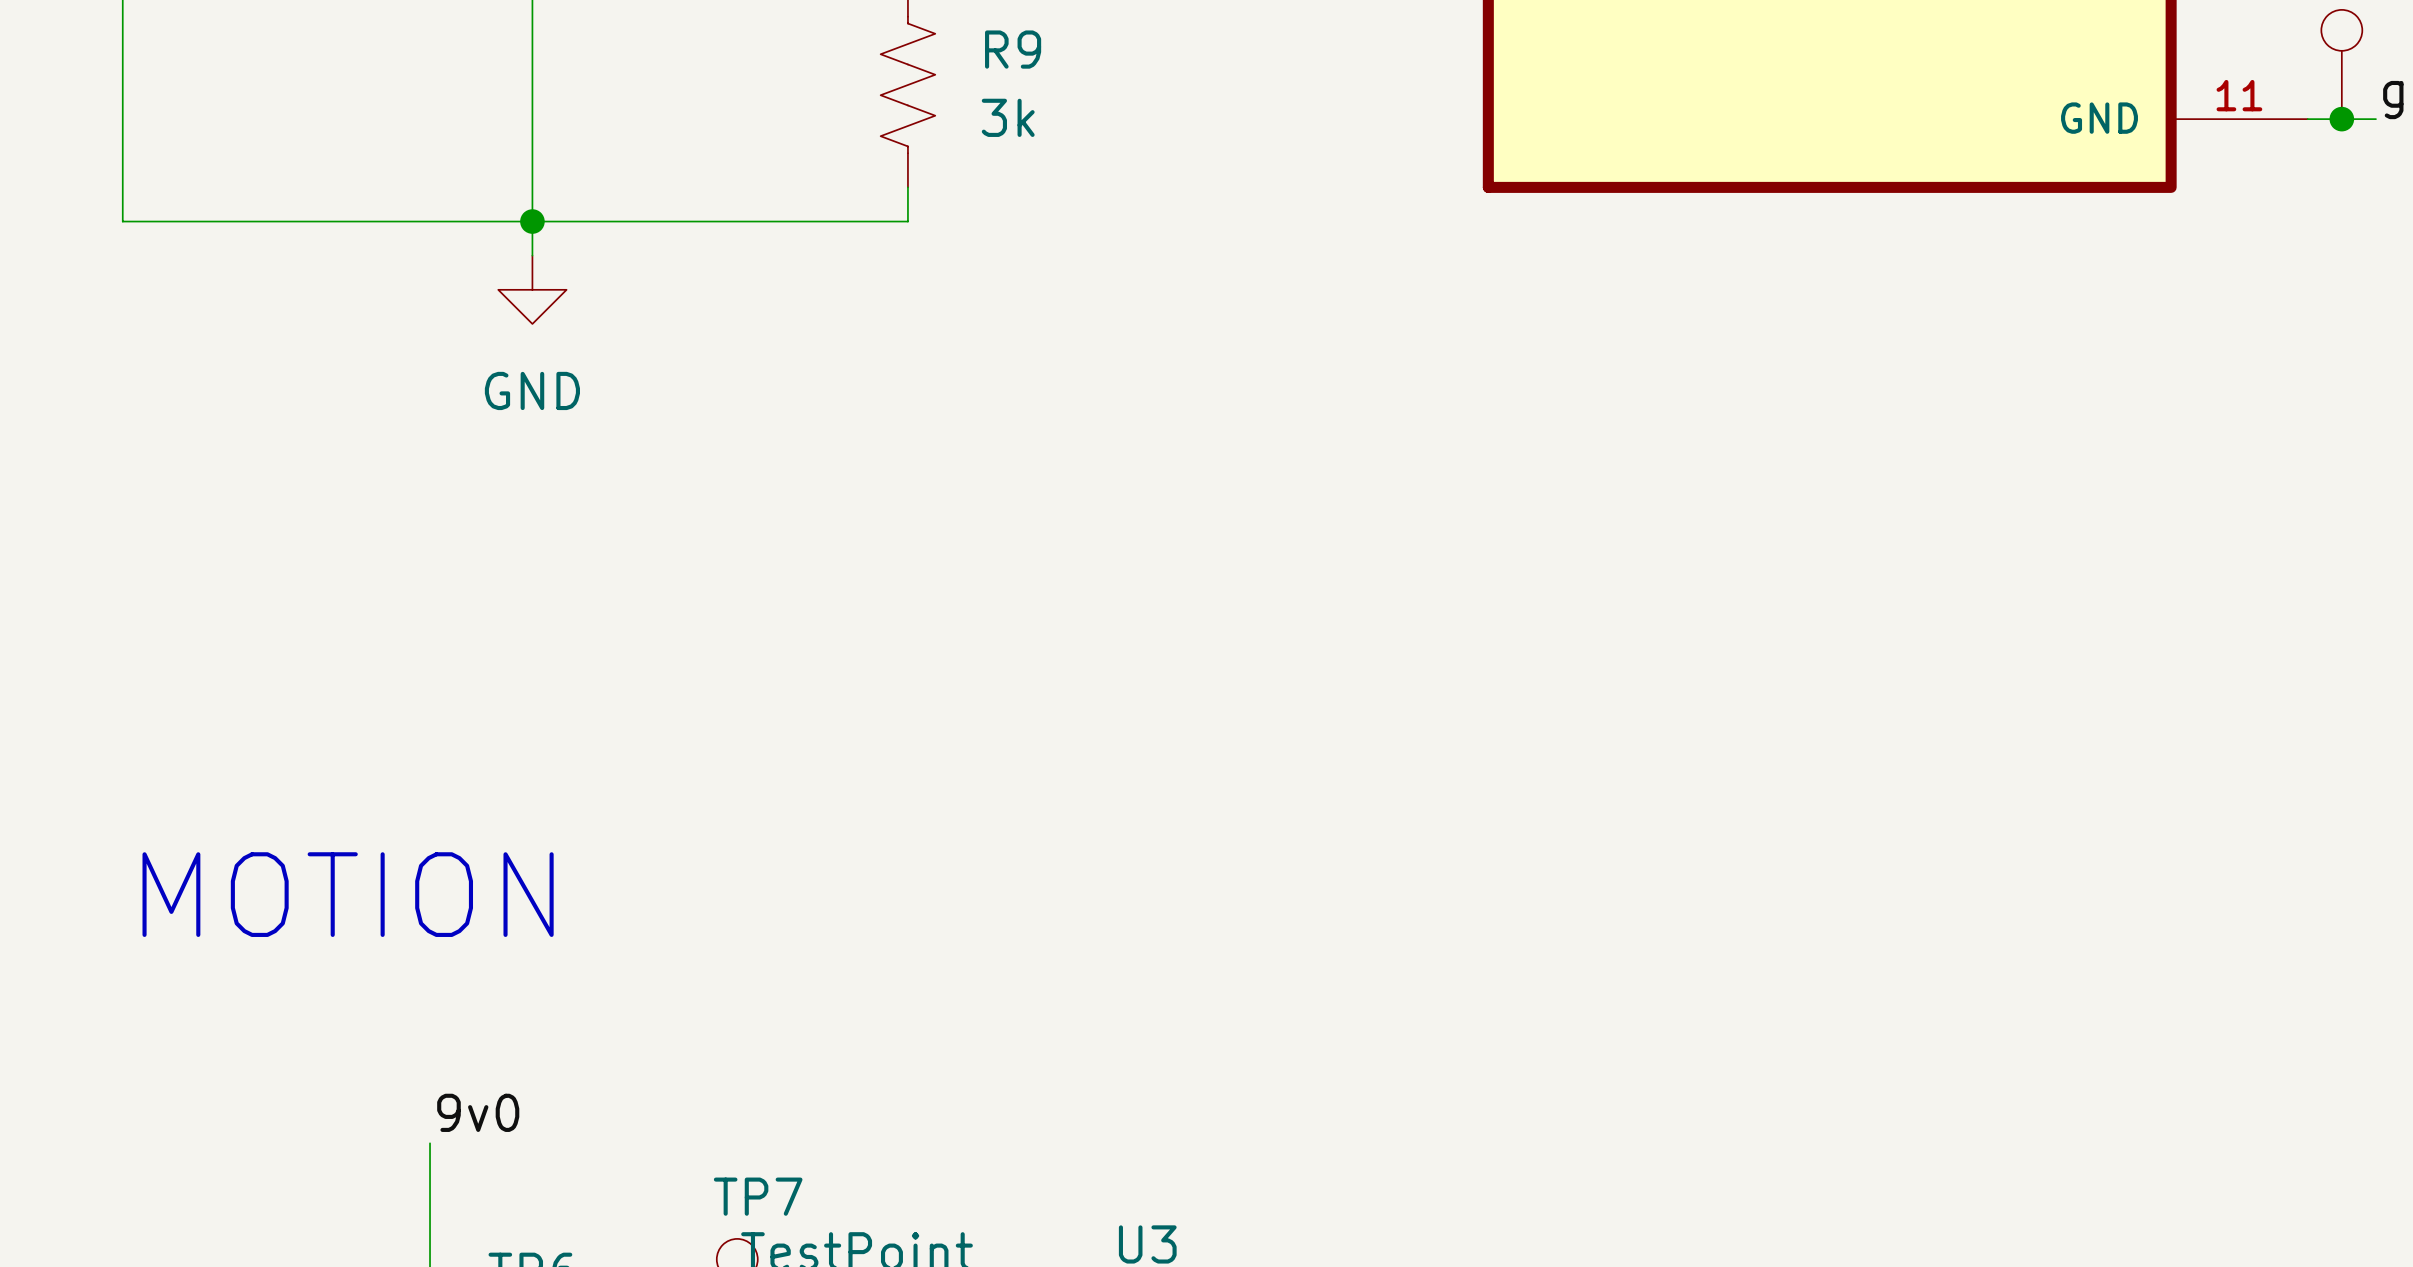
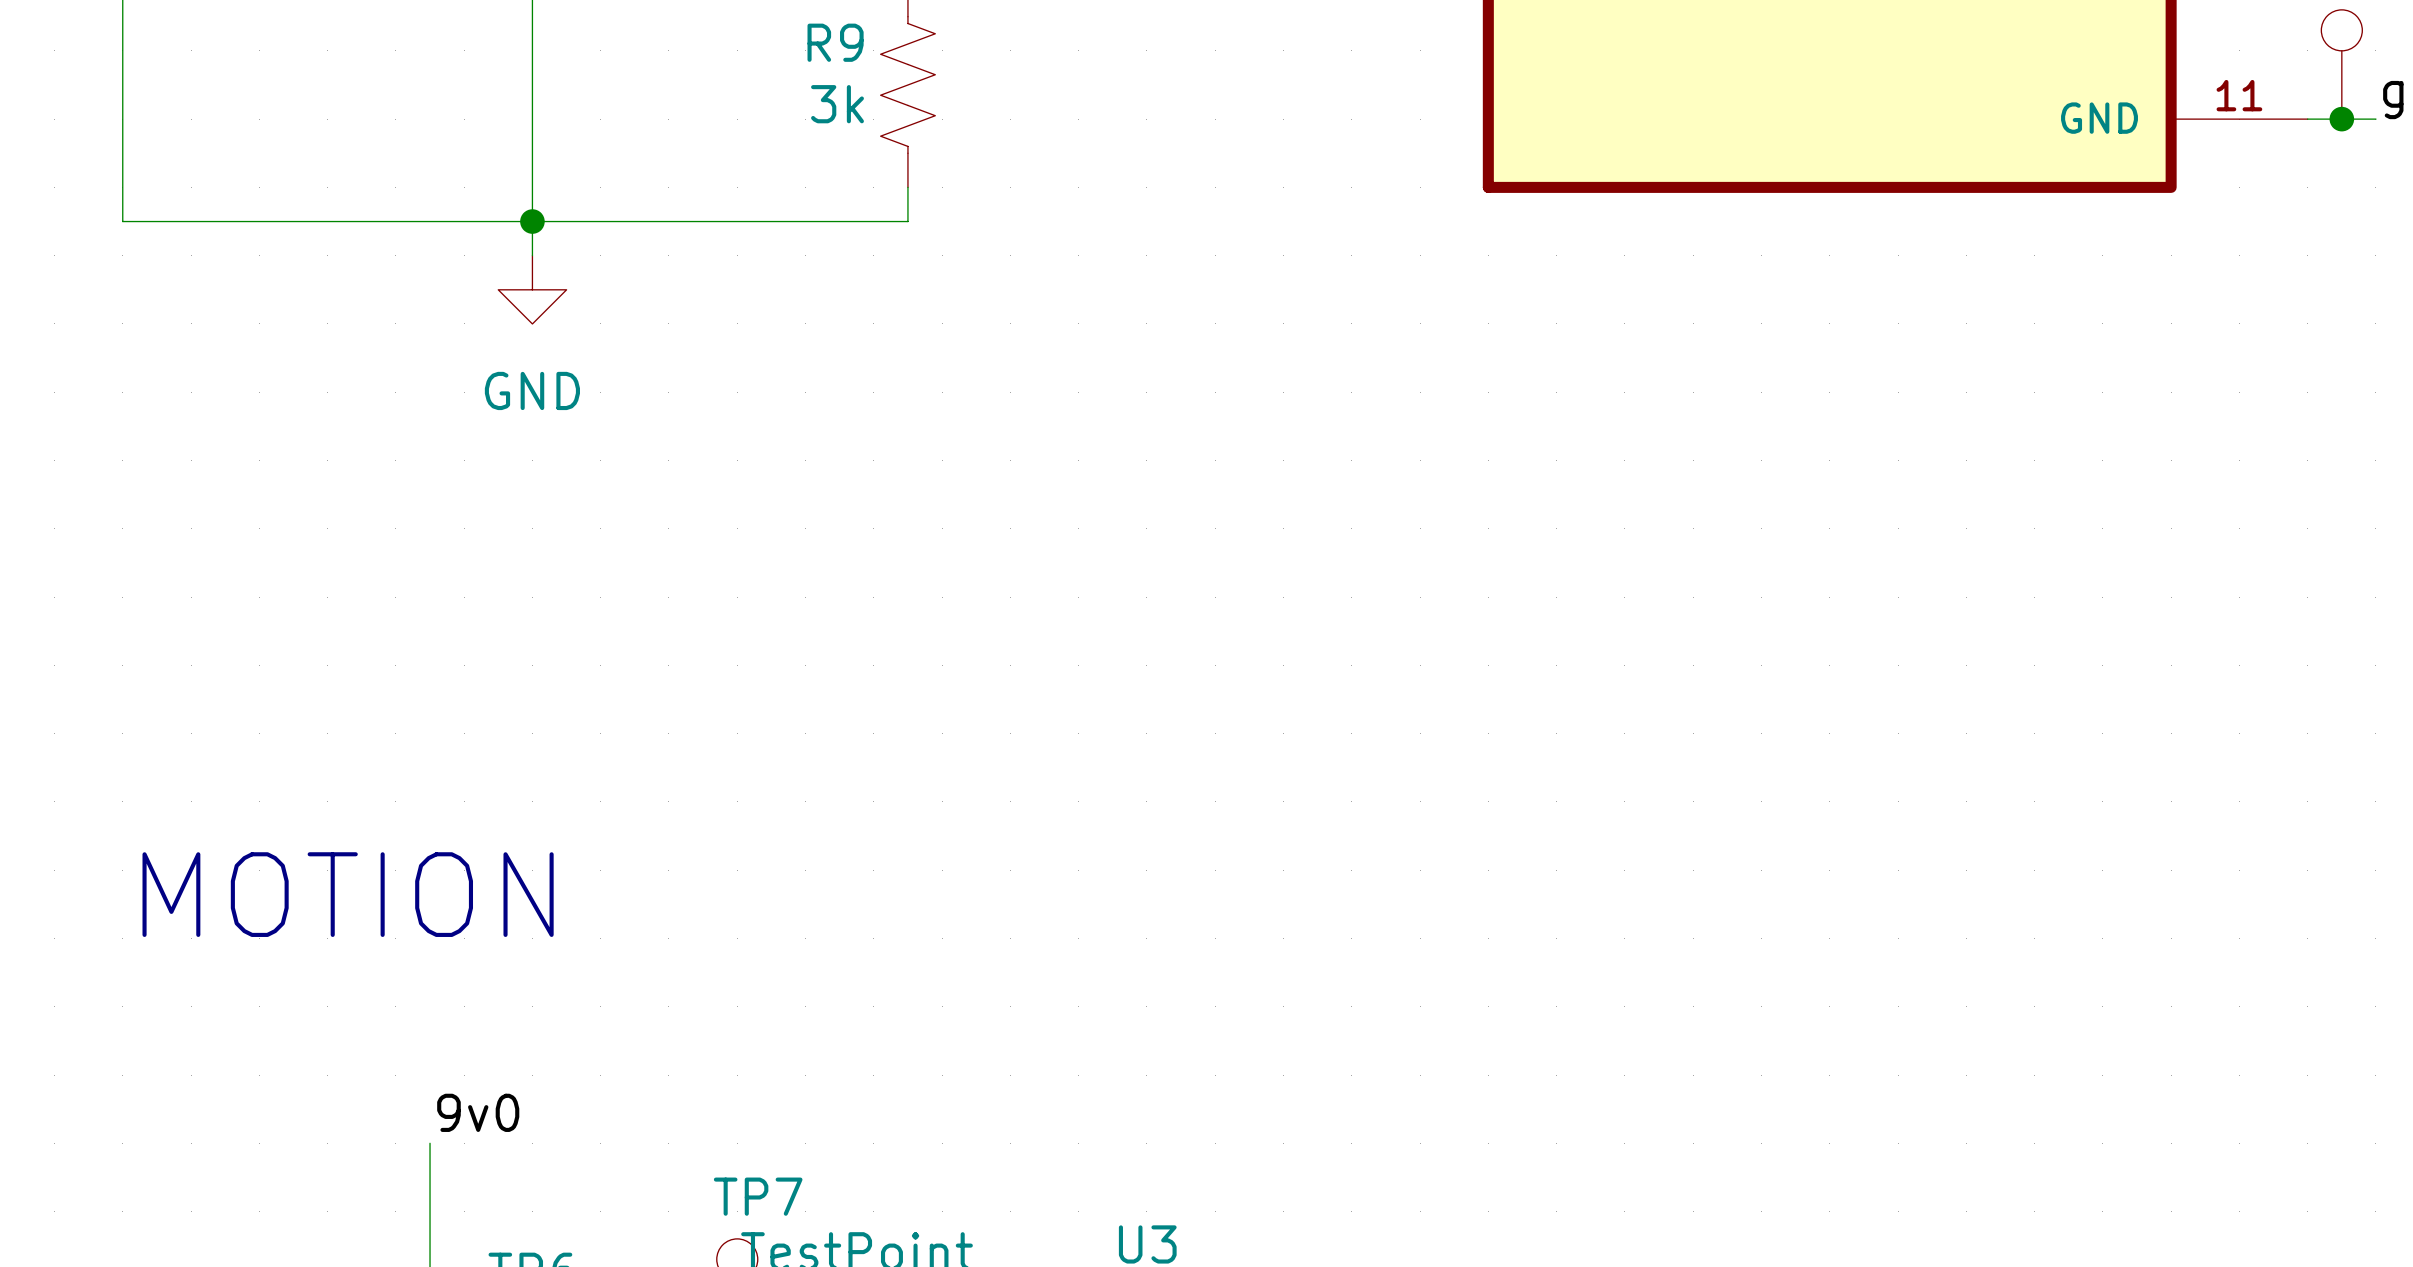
R9 name position: R9 (1013, 49) -> R9 (835, 42)
R9 value position: 3k (1008, 117) -> 3k (837, 104)

